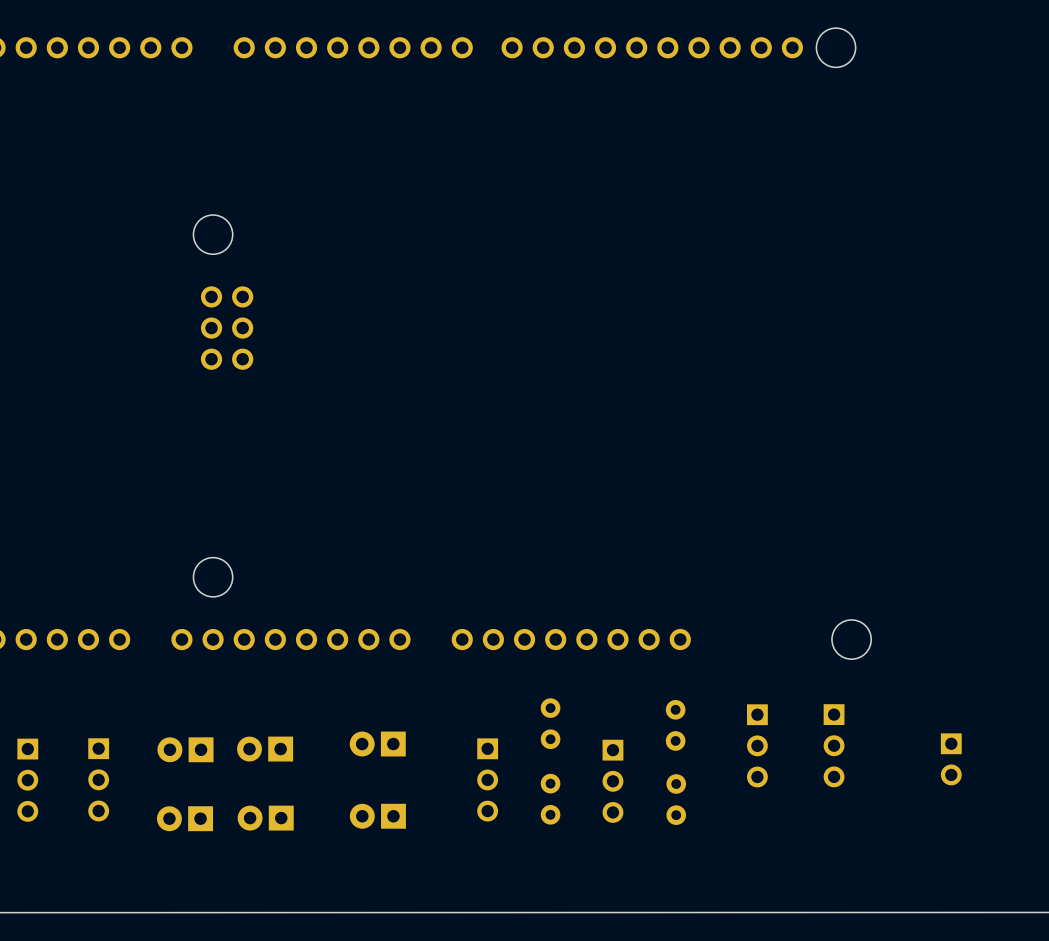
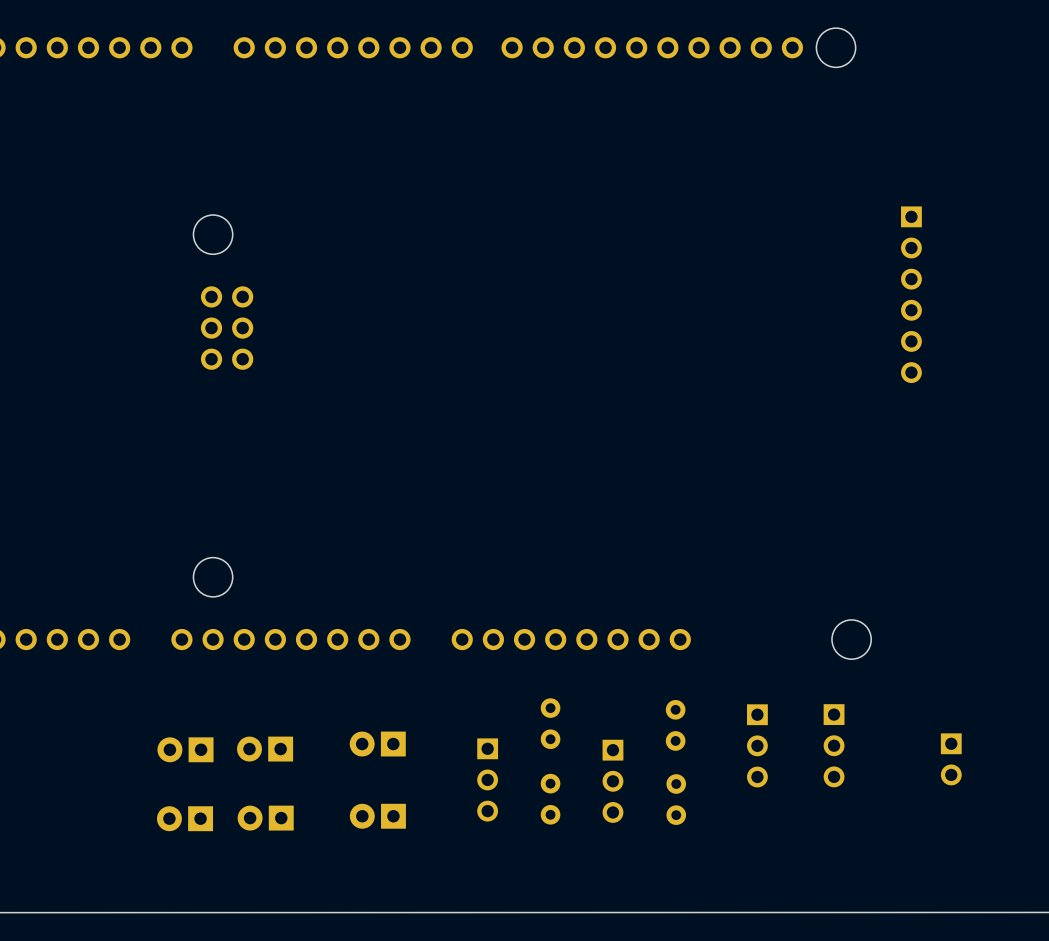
part: none -> (911, 294)
part: (98, 779) -> none
part: (27, 780) -> none

